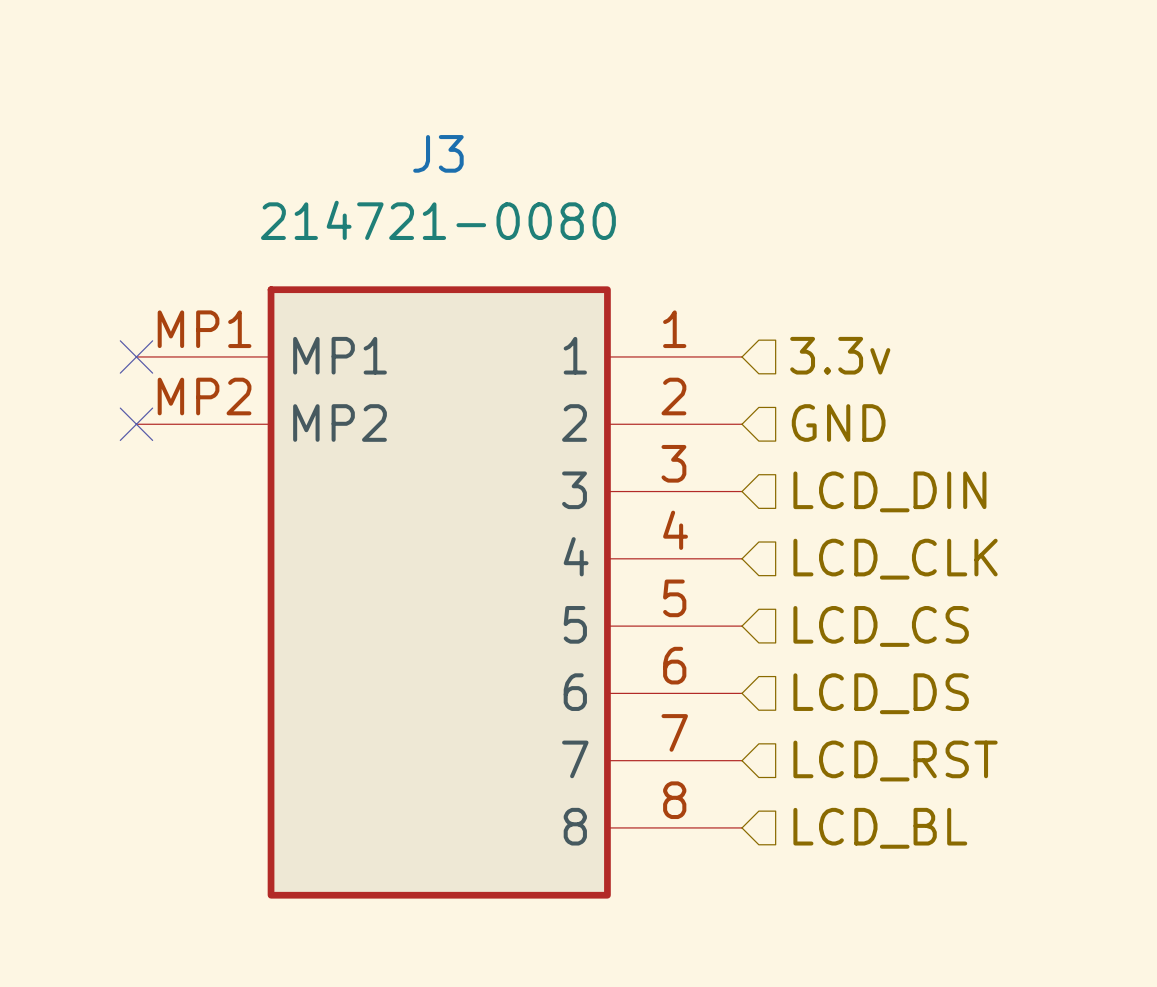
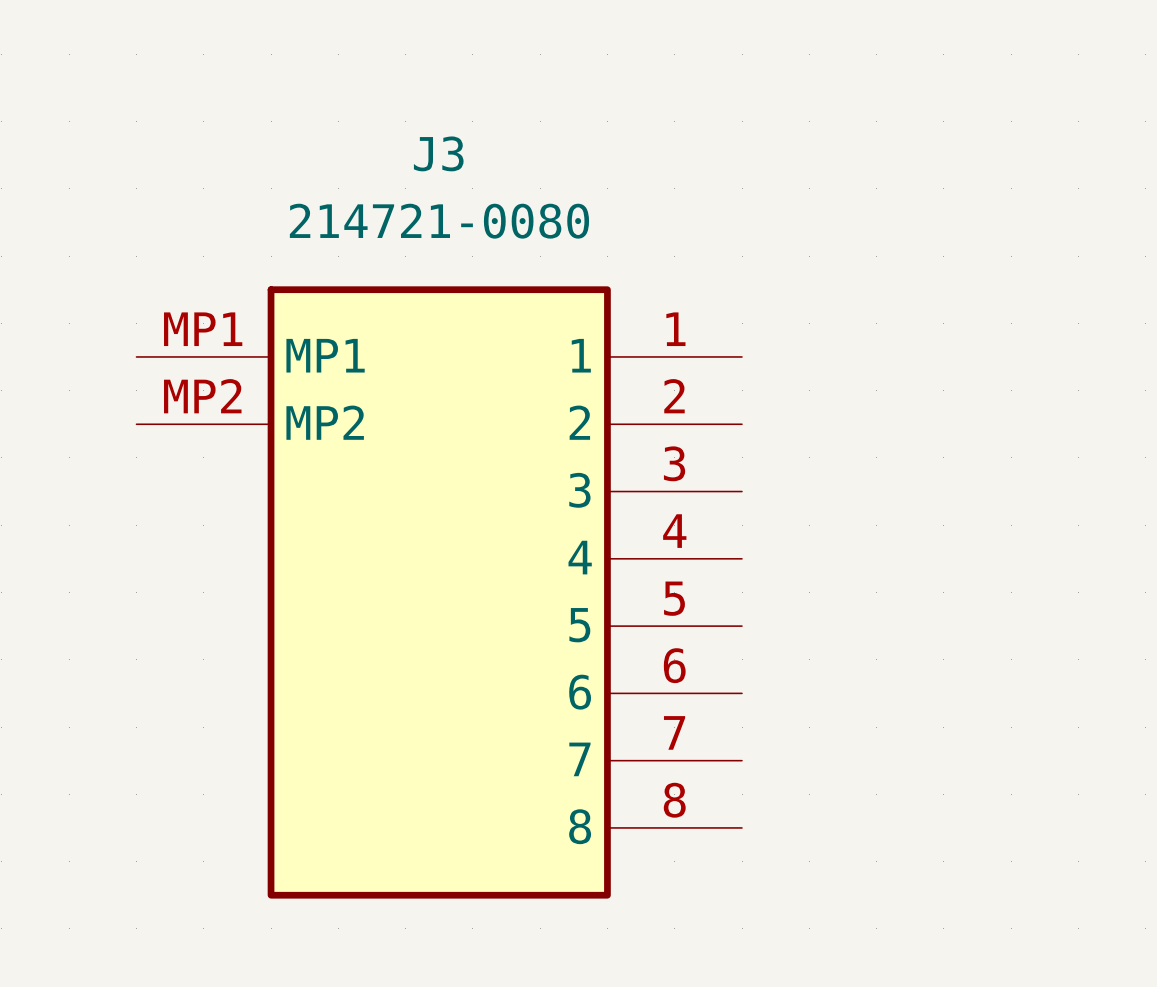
hierarchical label: 3.3v (840, 355) -> none
no-connect mark: (136, 356) -> none
hierarchical label: GND (838, 423) -> none
no-connect mark: (136, 424) -> none
hierarchical label: LCD_DIN (889, 491) -> none
hierarchical label: LCD_CLK (895, 559) -> none
hierarchical label: LCD_CS (881, 626) -> none
hierarchical label: LCD_DS (881, 693) -> none
hierarchical label: LCD_RST (895, 761) -> none
hierarchical label: LCD_BL (880, 828) -> none

